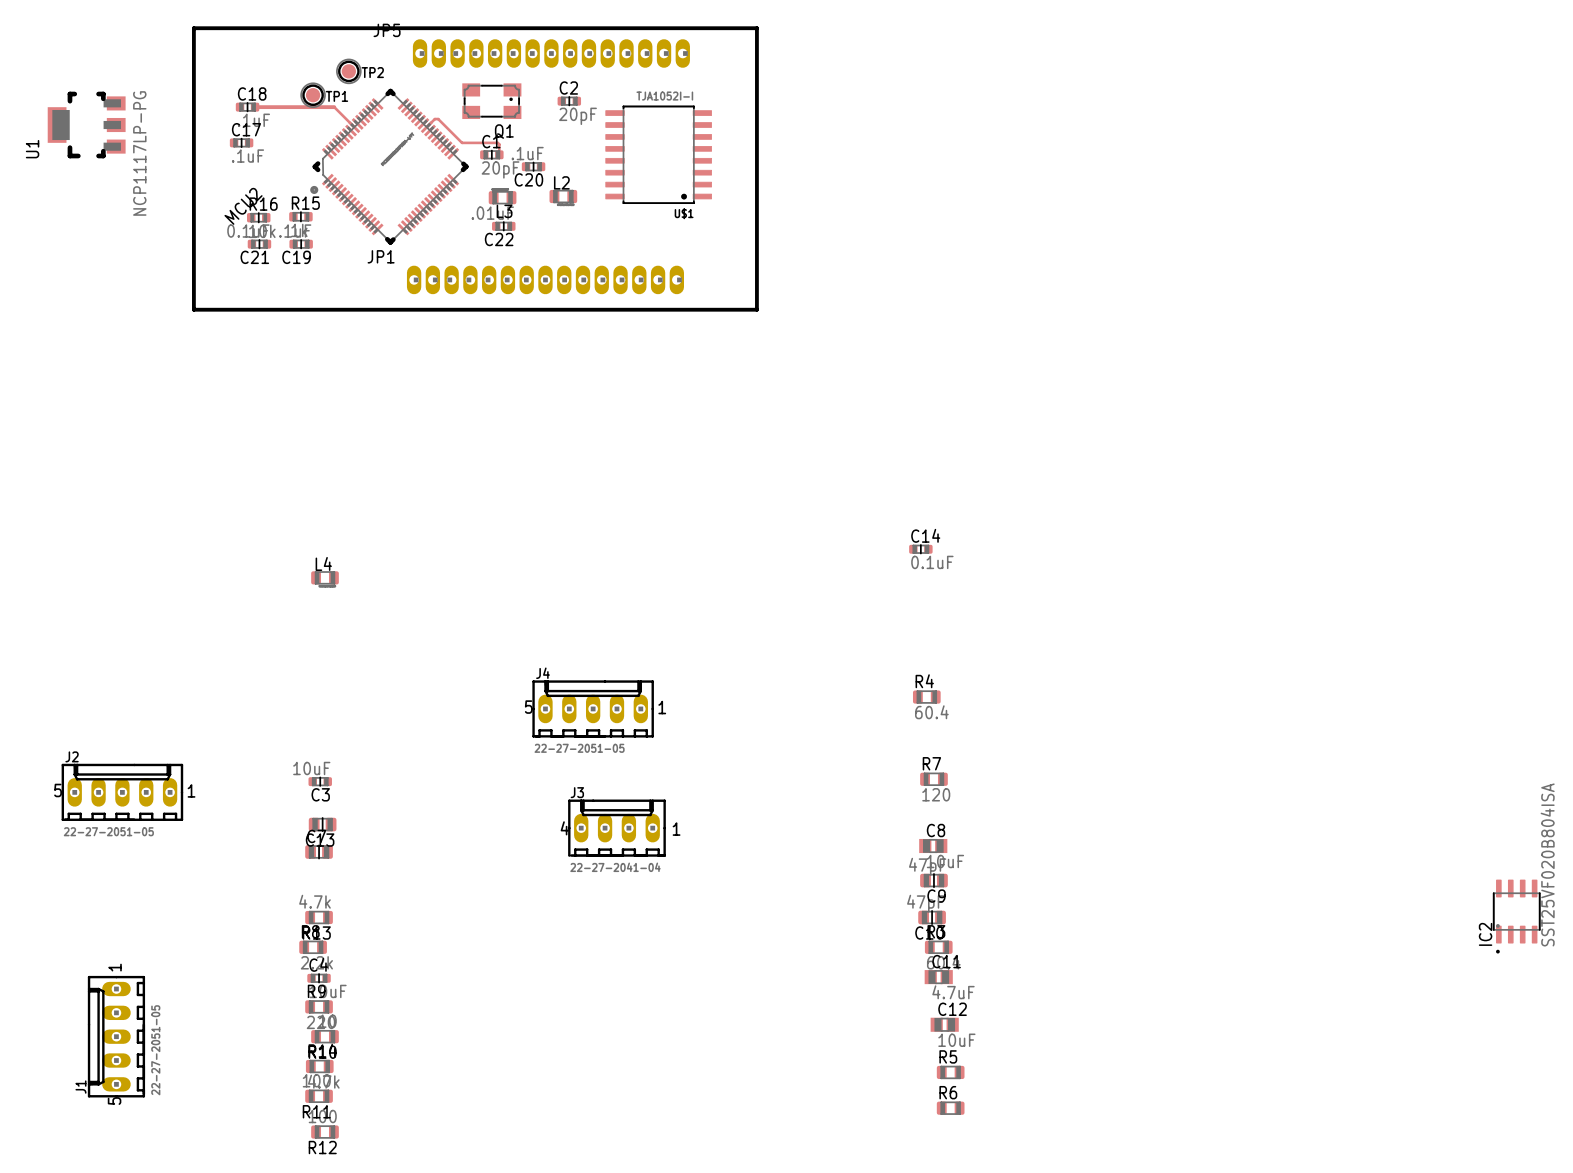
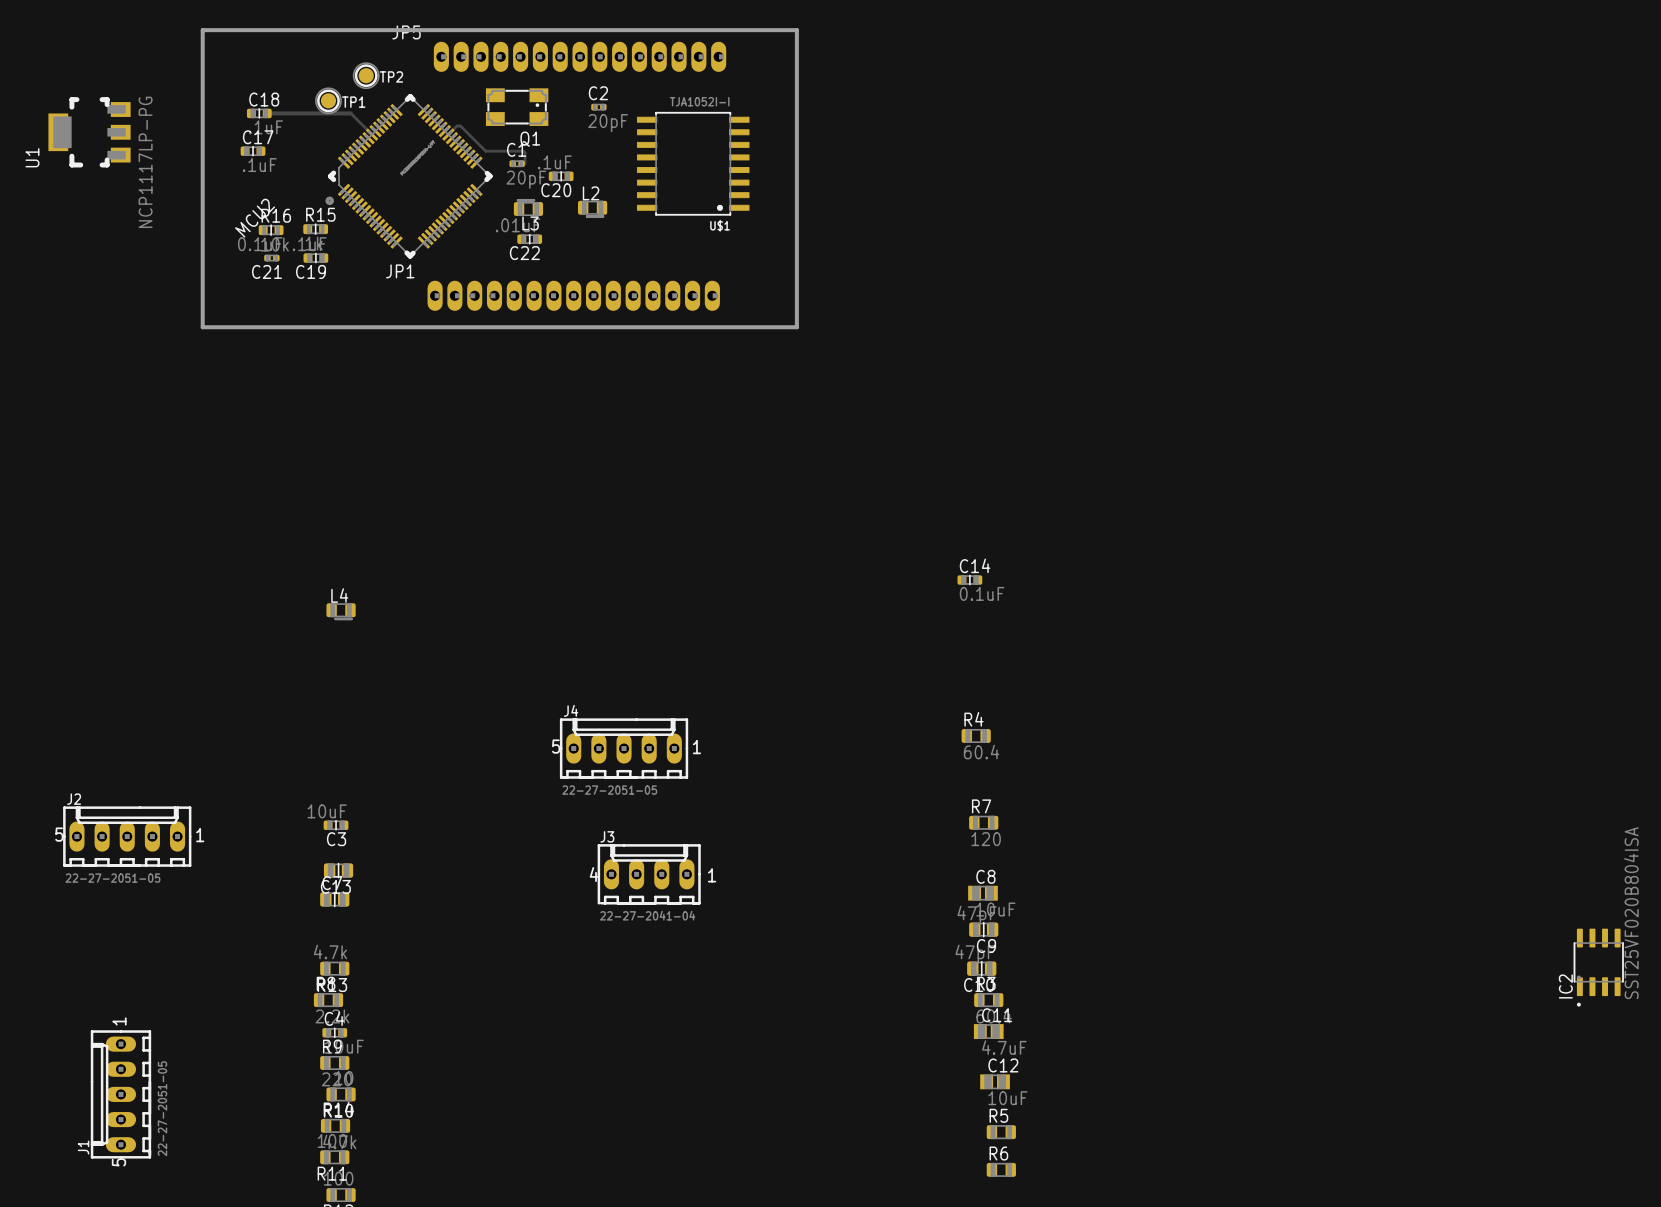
C2 footprint: [557, 96, 582, 106] -> [591, 103, 607, 111]
C1 footprint: [480, 149, 504, 160] -> [509, 160, 525, 167]
C21 footprint: [247, 239, 272, 250] -> [264, 254, 280, 262]

